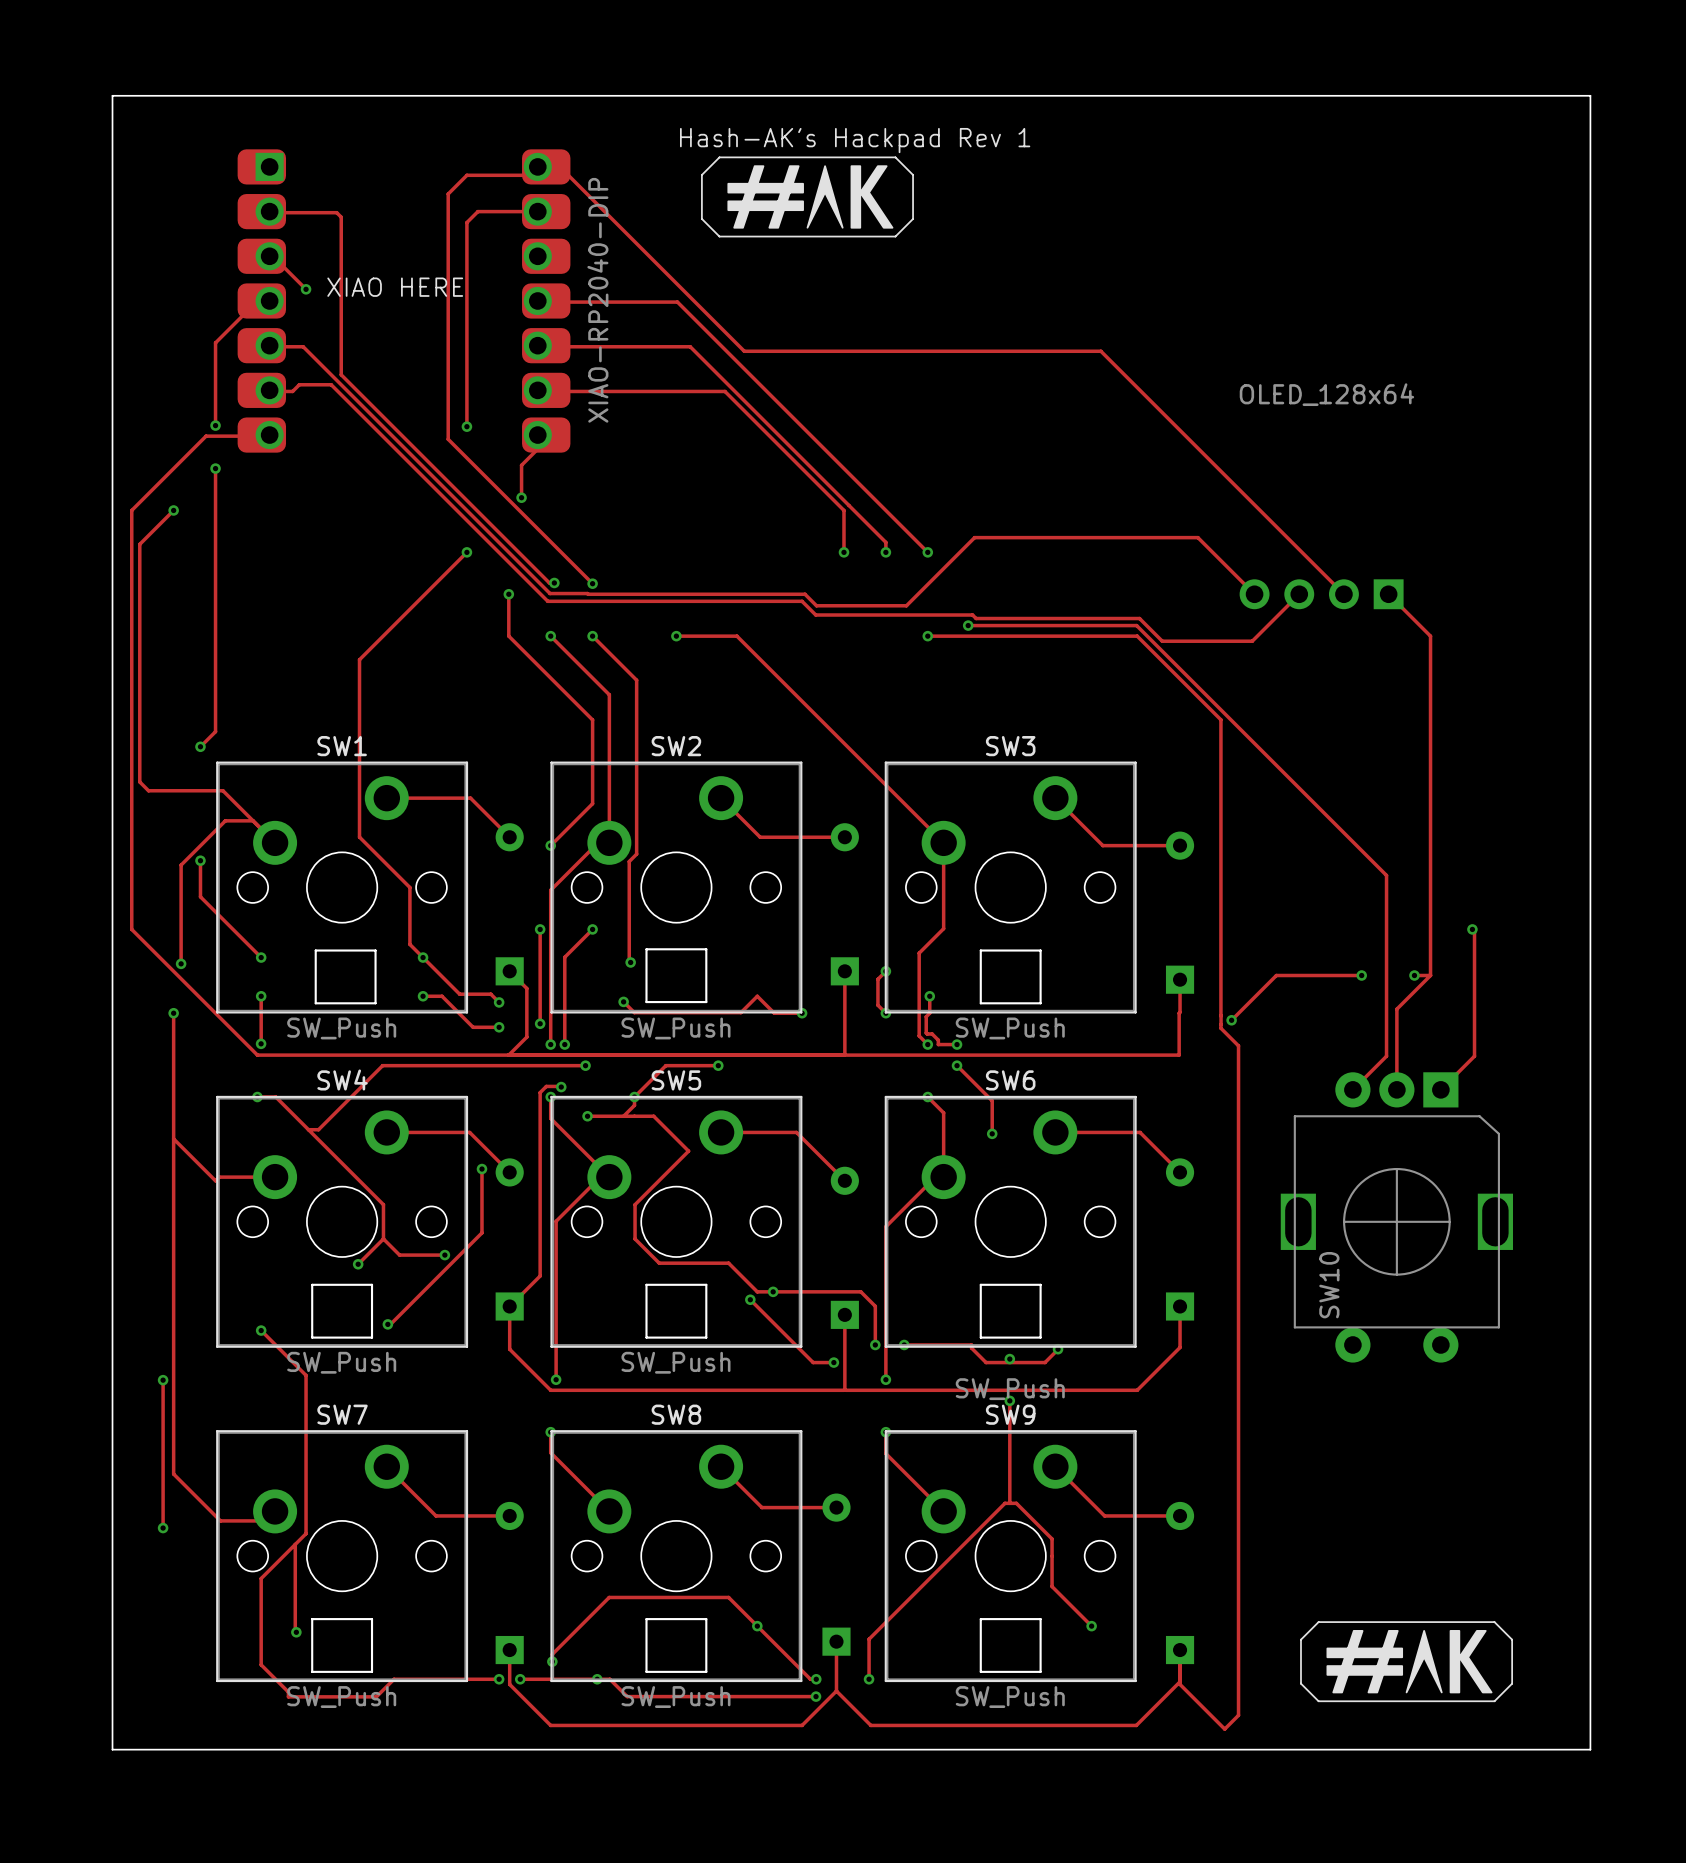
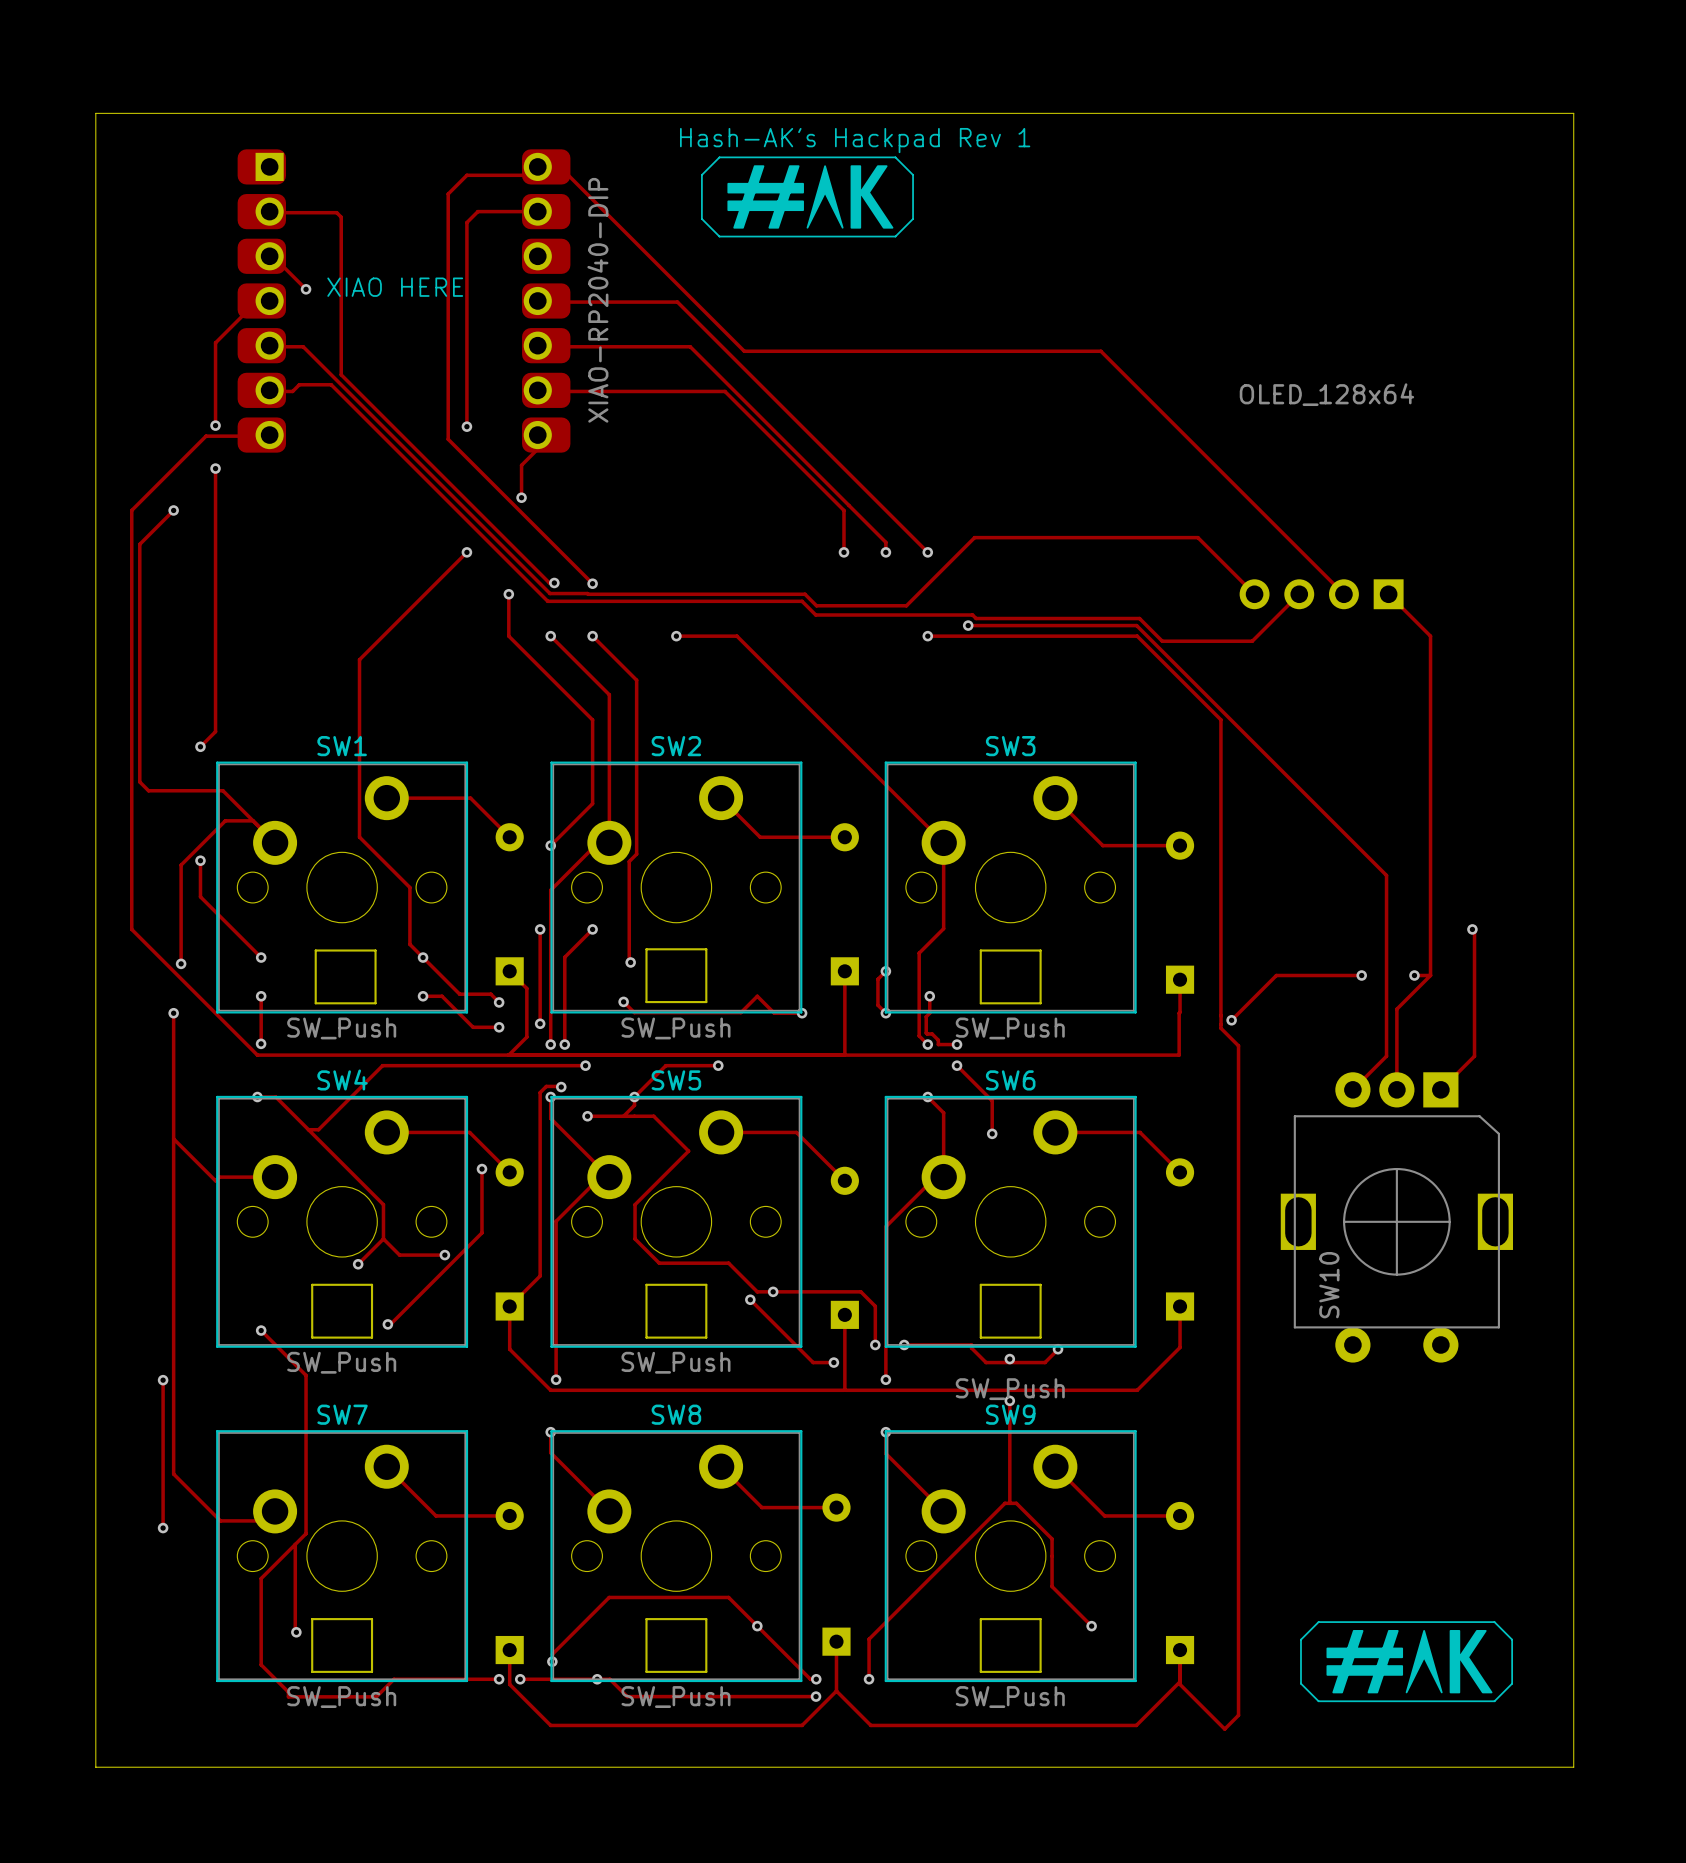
board edge: (112, 95) (1590, 95) (1590, 1749) (112, 1749) (112, 95) -> (95, 113) (1573, 113) (1573, 1767) (95, 1767) (95, 113)

